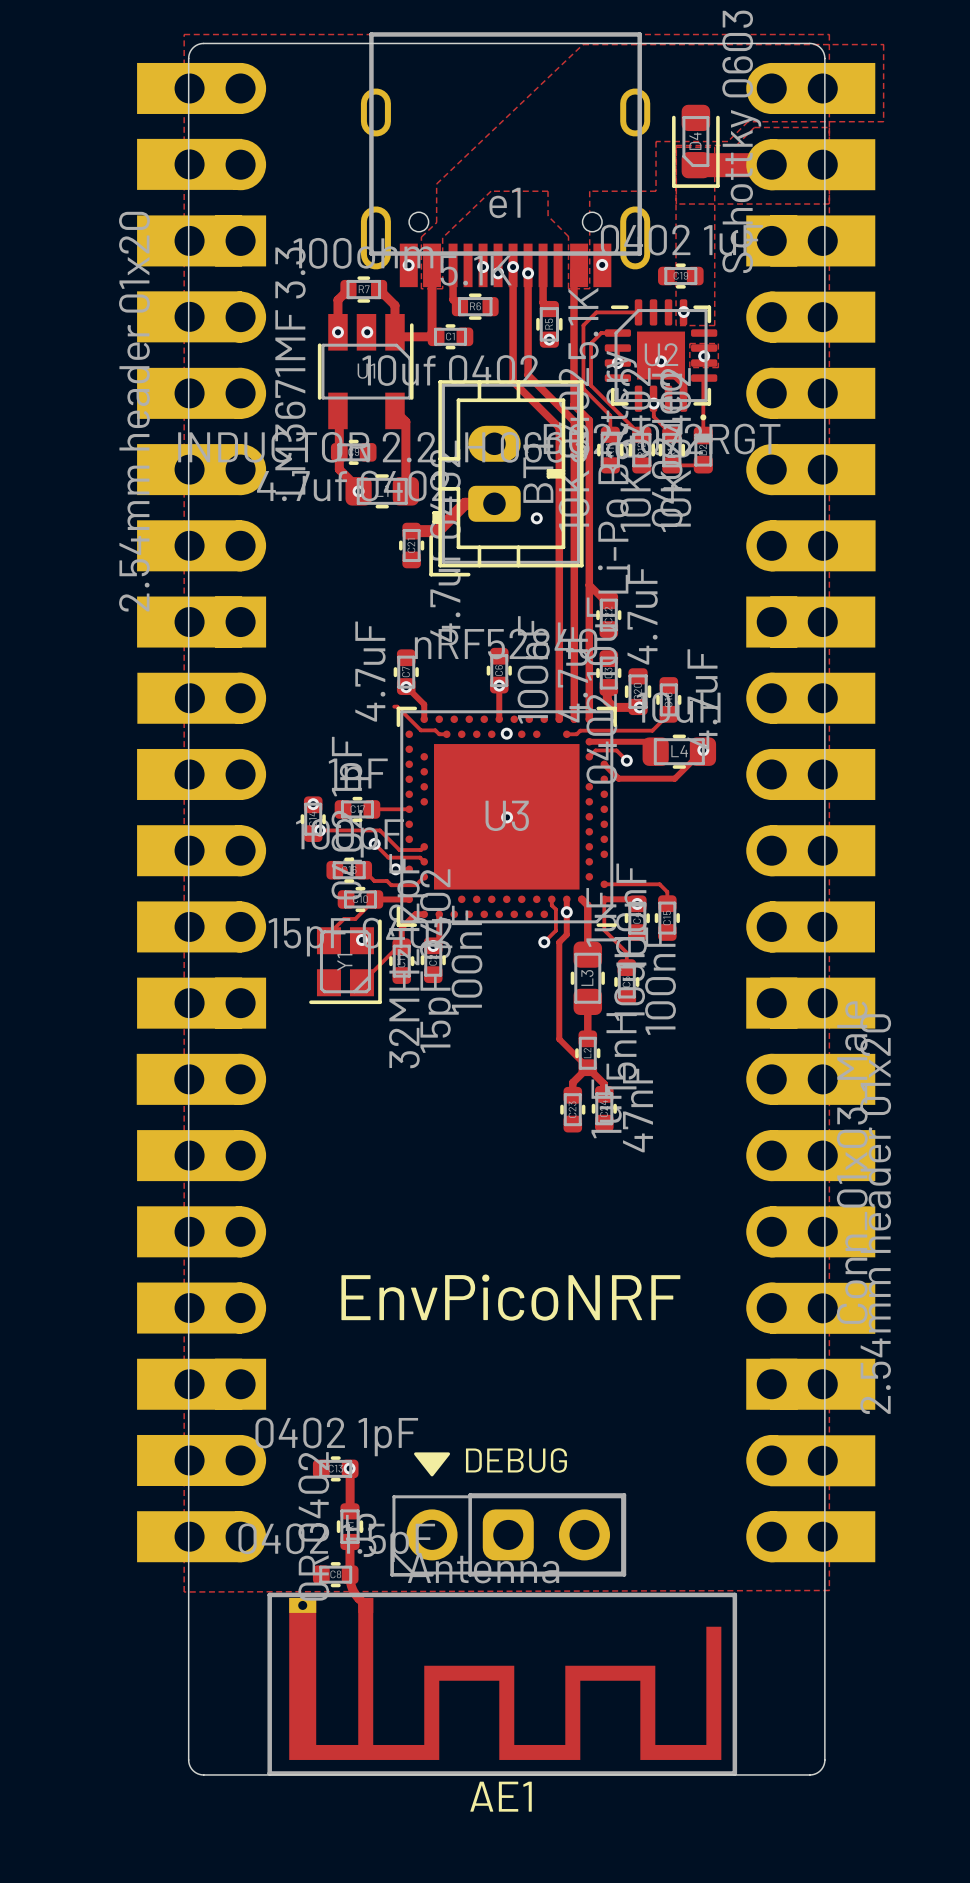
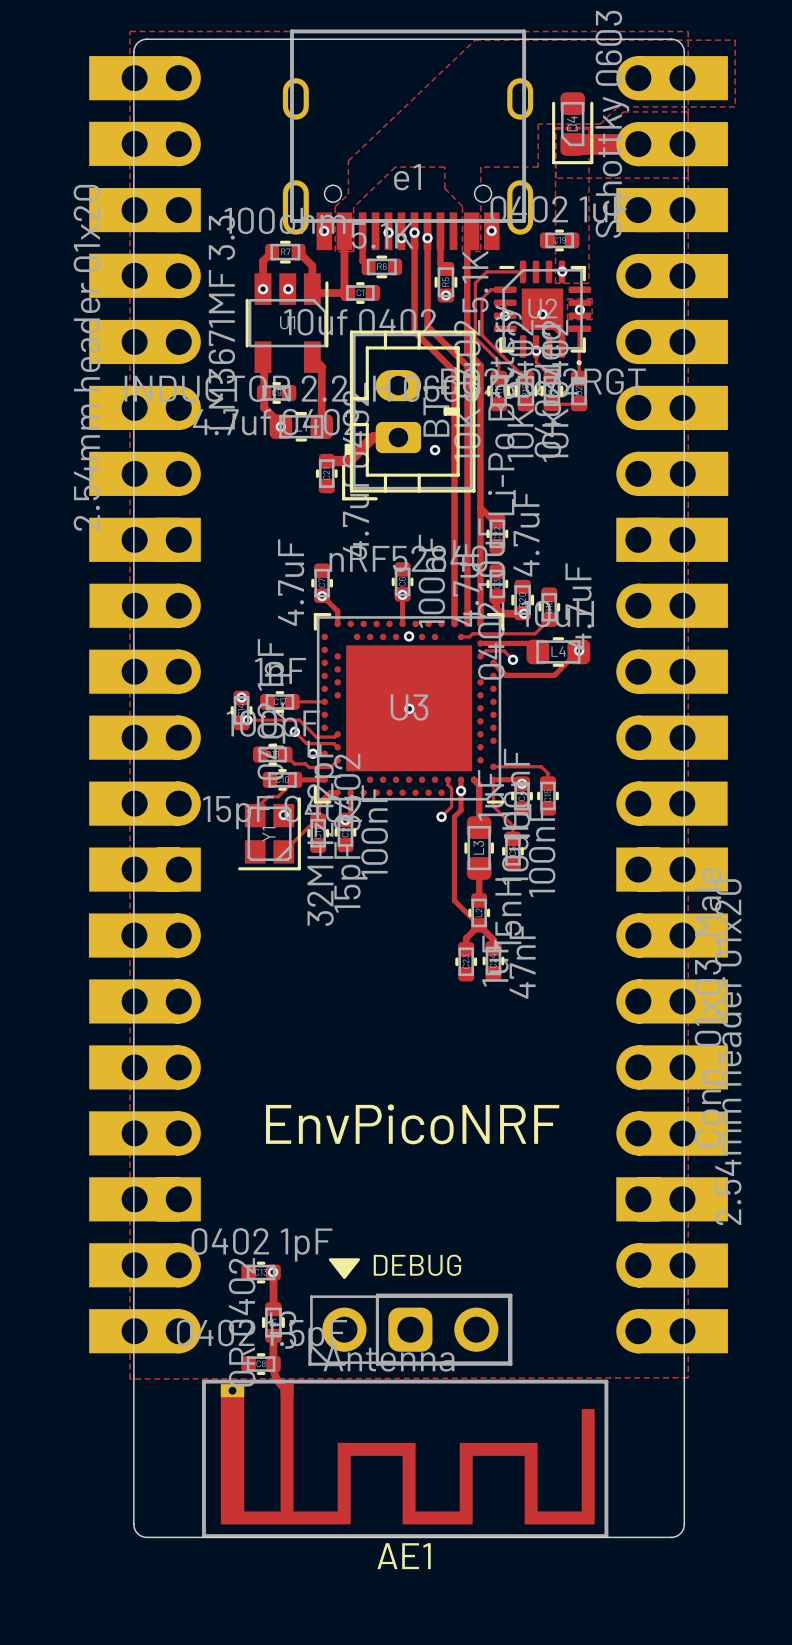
track: (394, 706) (397, 706) (420, 730) (435, 730) (439, 734) (446, 734) -> none

